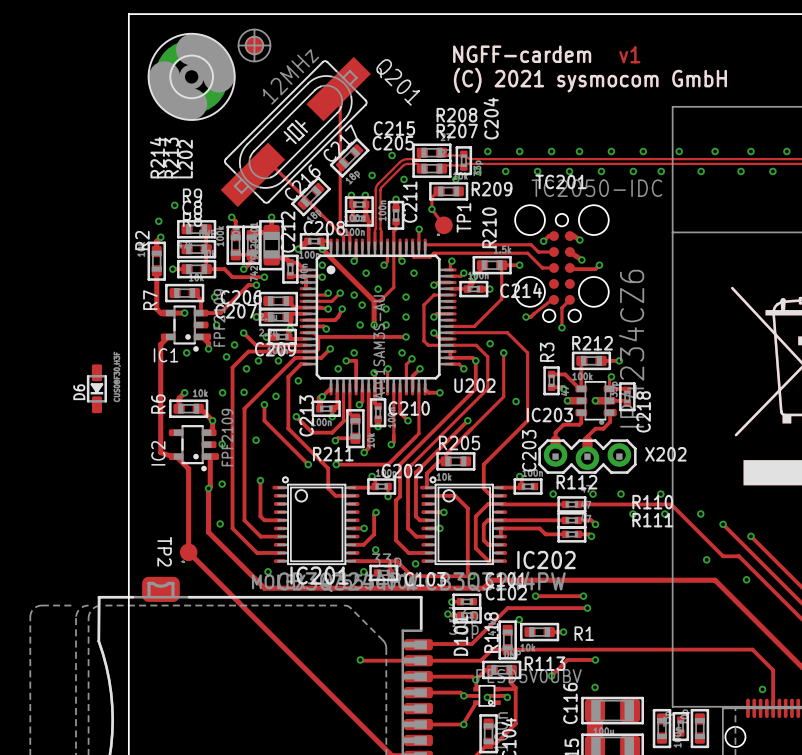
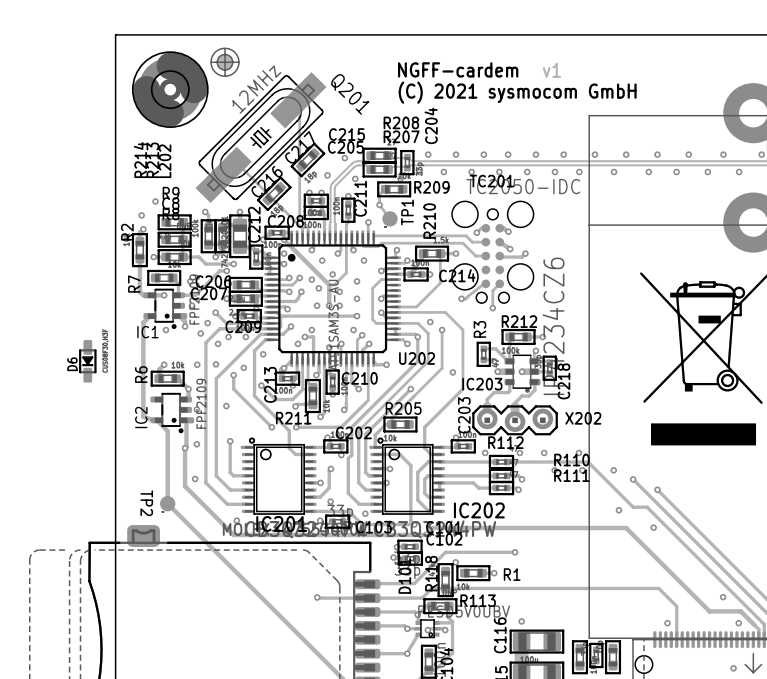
track: (535, 596) (583, 596) -> none
via: (535, 596) -> none
via: (583, 596) -> none
track: (595, 659) (567, 659) (551, 675) -> none
via: (595, 659) -> none
via: (551, 675) -> none

